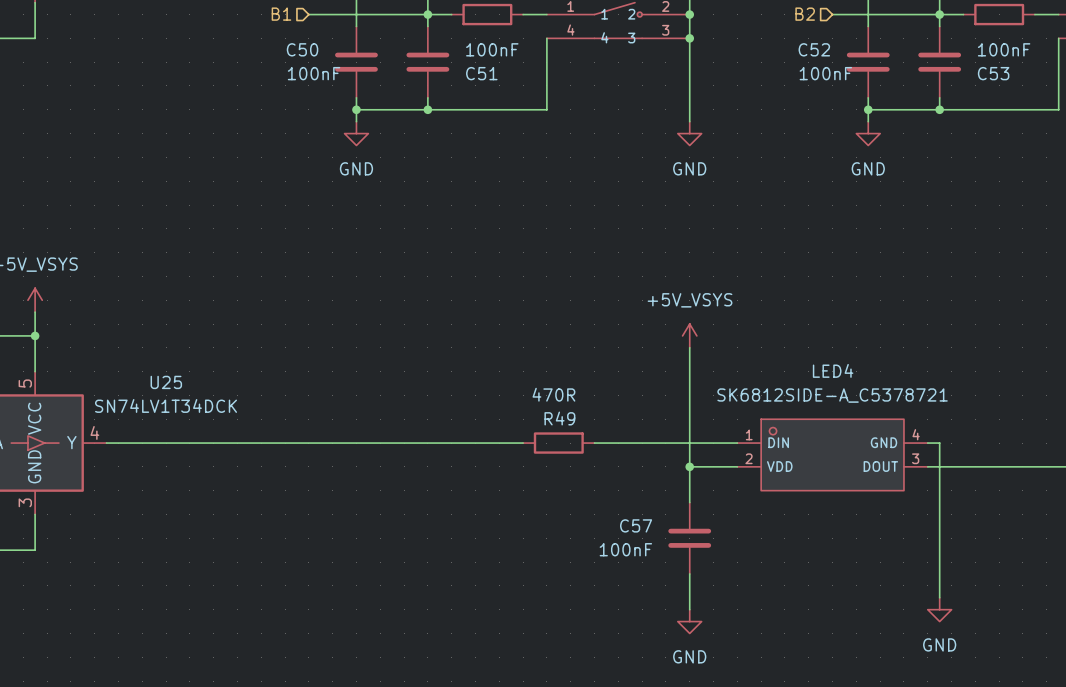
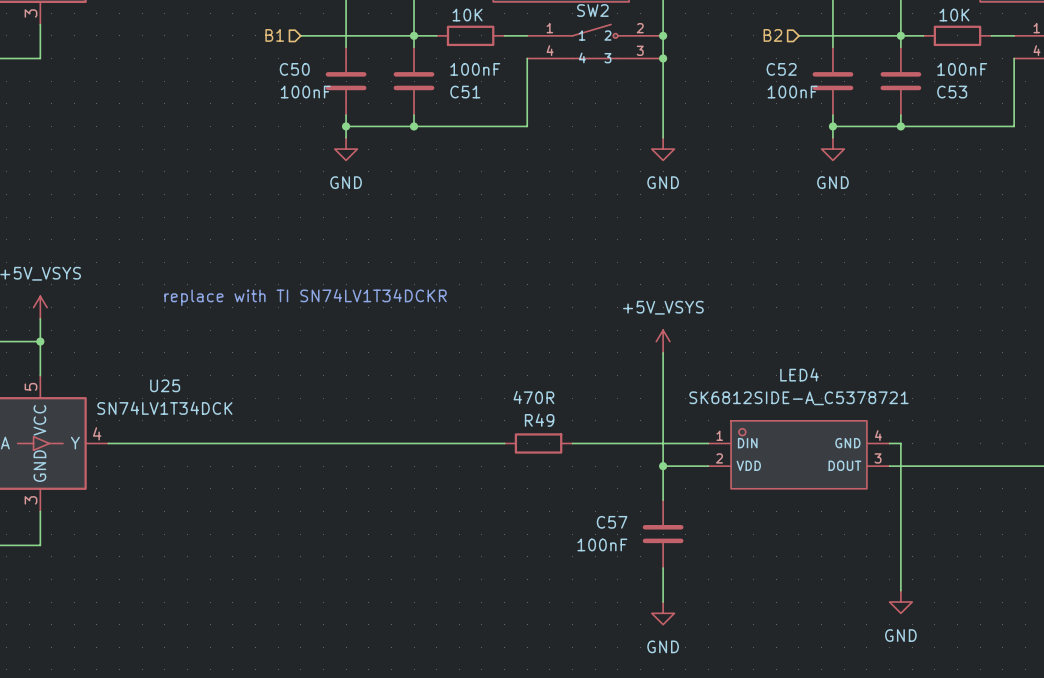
text: none -> replace with TI SN74LV1T34DCKR (305, 297)

